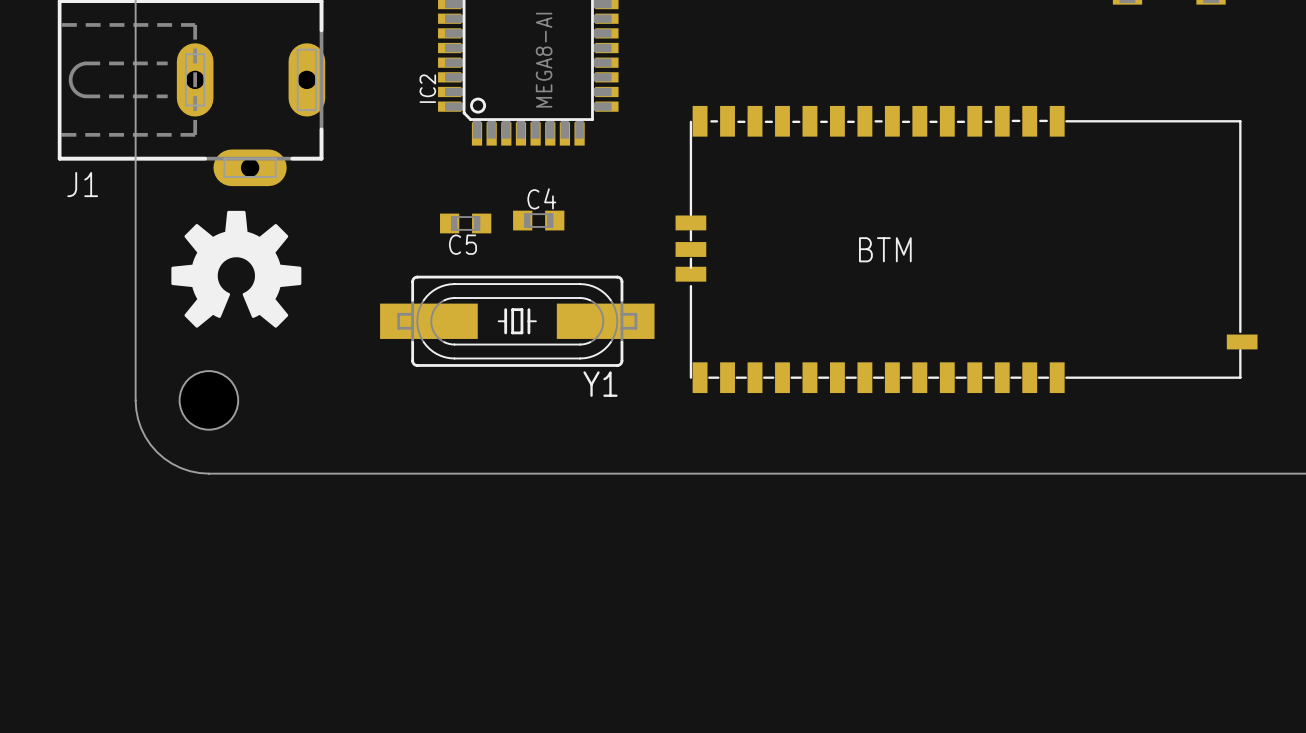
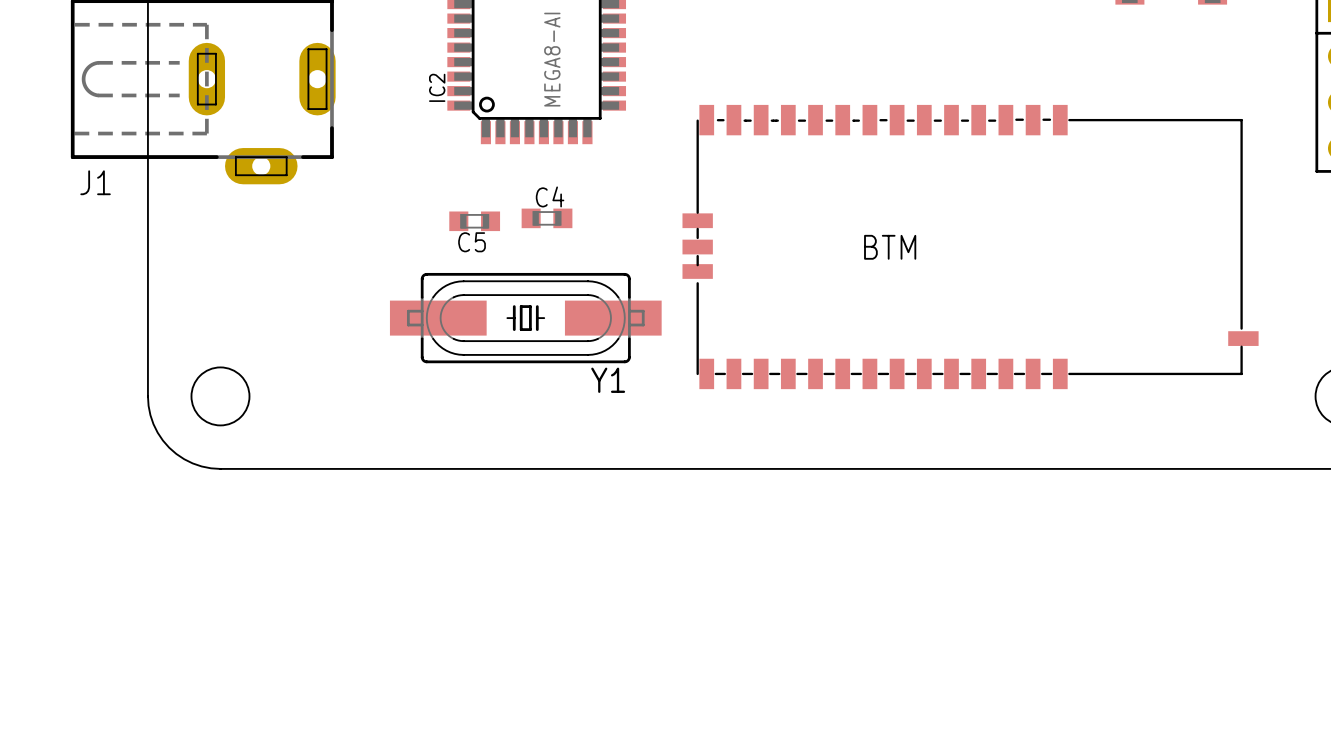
drawing: [171, 210, 302, 328] -> none

